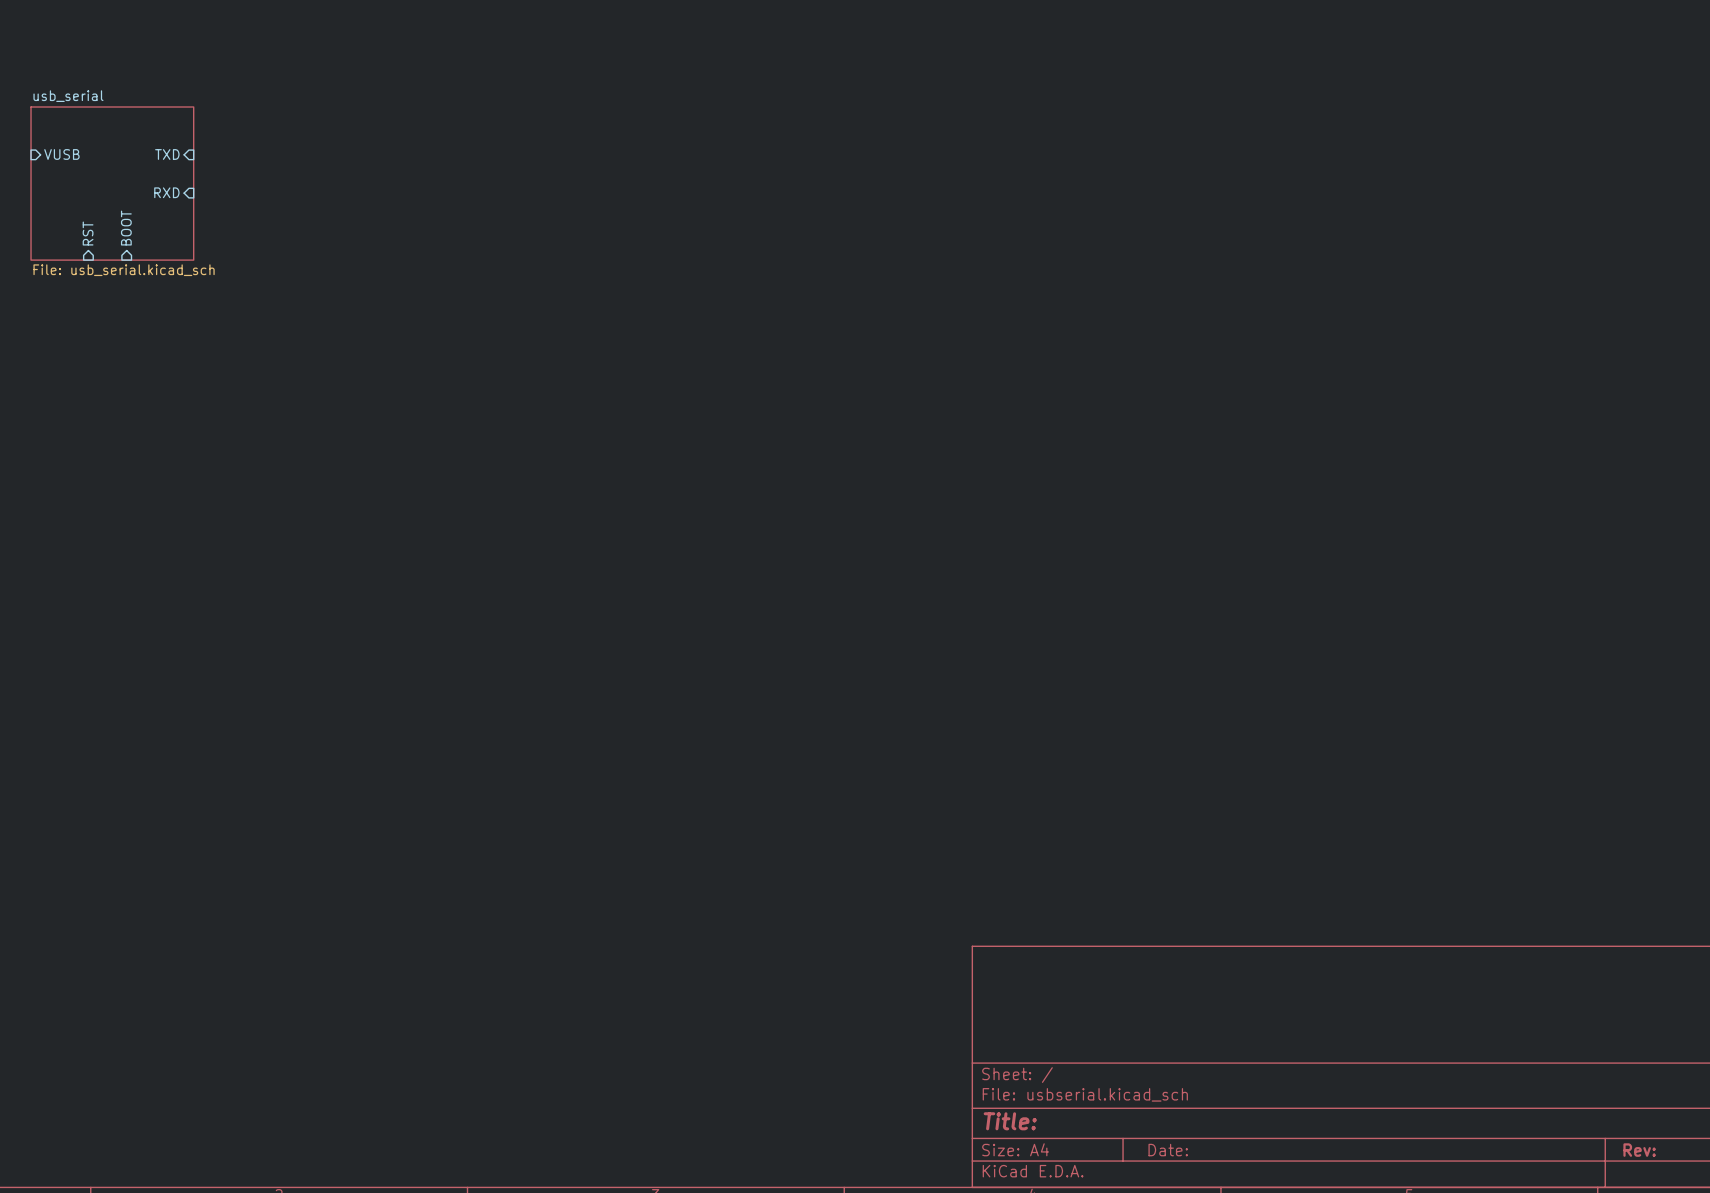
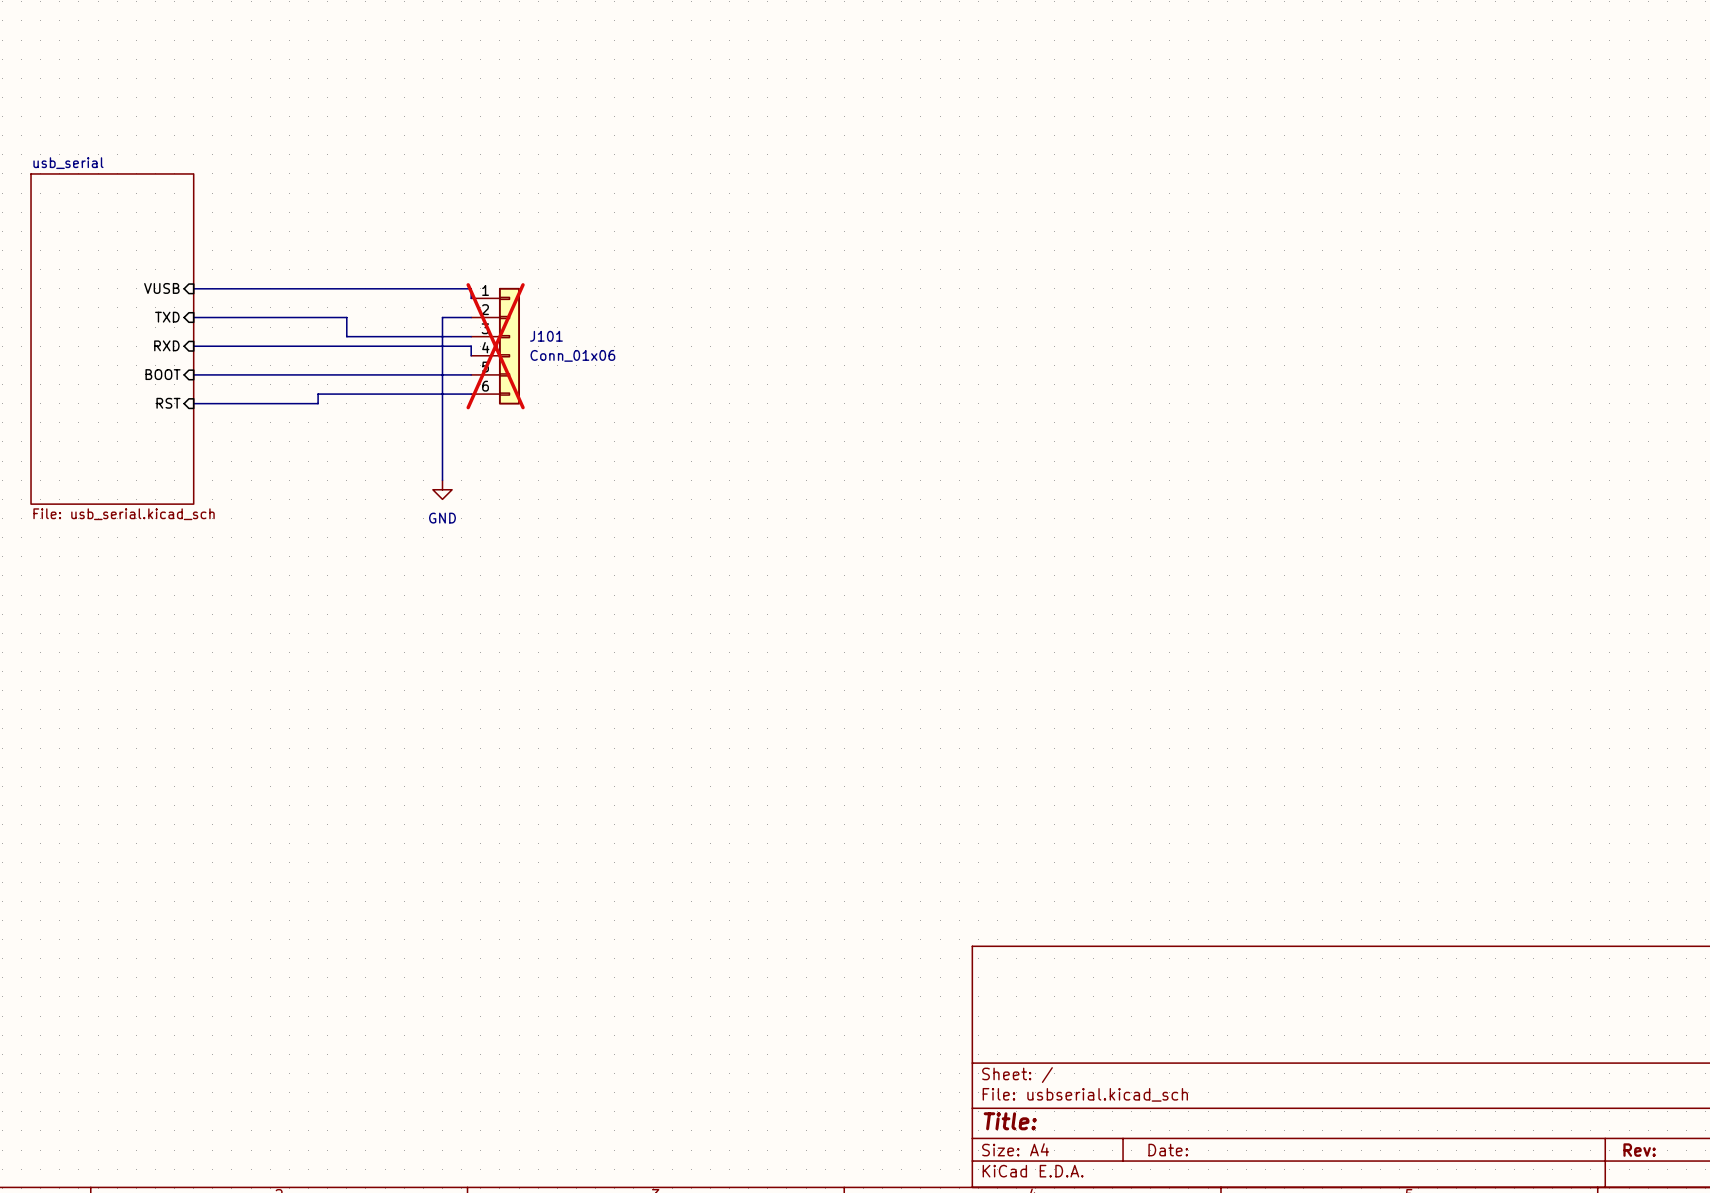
sheet pin: VUSB (61, 154) -> none
sheet pin position: TXD (167, 154) -> TXD (167, 317)
sheet usb_serial: File: usb_serial.kicad_sch (112, 183) -> none
sheet pin position: RXD (166, 192) -> RXD (166, 345)
sheet pin rotation: 0° (126, 228) -> 90° counterclockwise (163, 374)
sheet pin position: BOOT (126, 228) -> BOOT (163, 374)
sheet pin rotation: 0° (88, 233) -> 90° counterclockwise (168, 403)
sheet pin position: RST (88, 233) -> RST (168, 403)
sheet pin: none -> VUSB (161, 288)
wire: none -> (193, 288) (471, 288) (471, 298)
wire: none -> (193, 317) (346, 317) (346, 336) (471, 336)
wire: none -> (471, 317) (442, 317) (442, 480)
sheet usb_serial: none -> File: usb_serial.kicad_sch (112, 339)
wire: none -> (193, 346) (471, 346) (471, 355)
J101: none -> Conn_01x06 (495, 346)
wire: none -> (193, 374) (471, 374)
wire: none -> (471, 394) (318, 394) (318, 403) (193, 403)
power symbol: none -> GND (442, 489)

